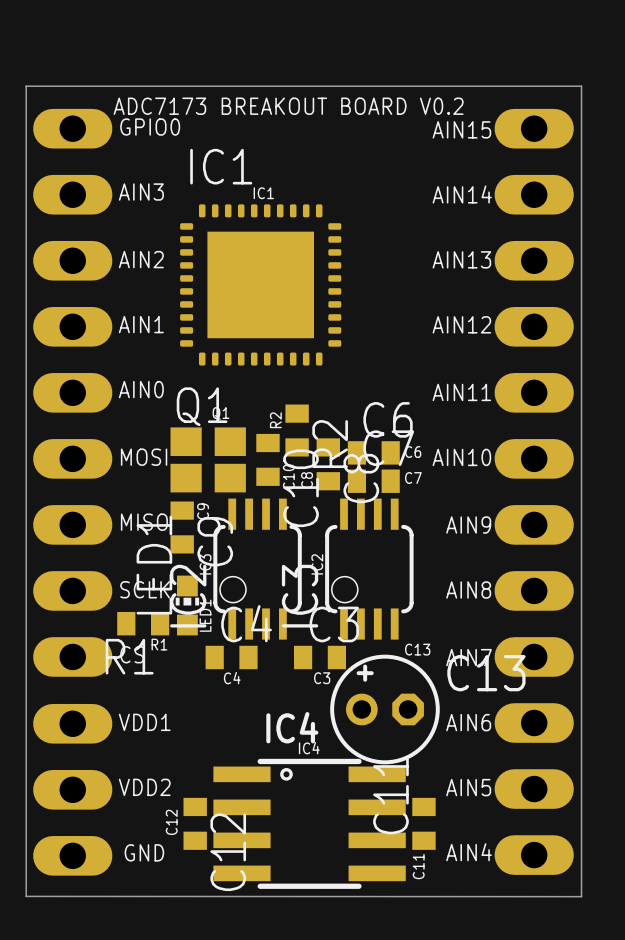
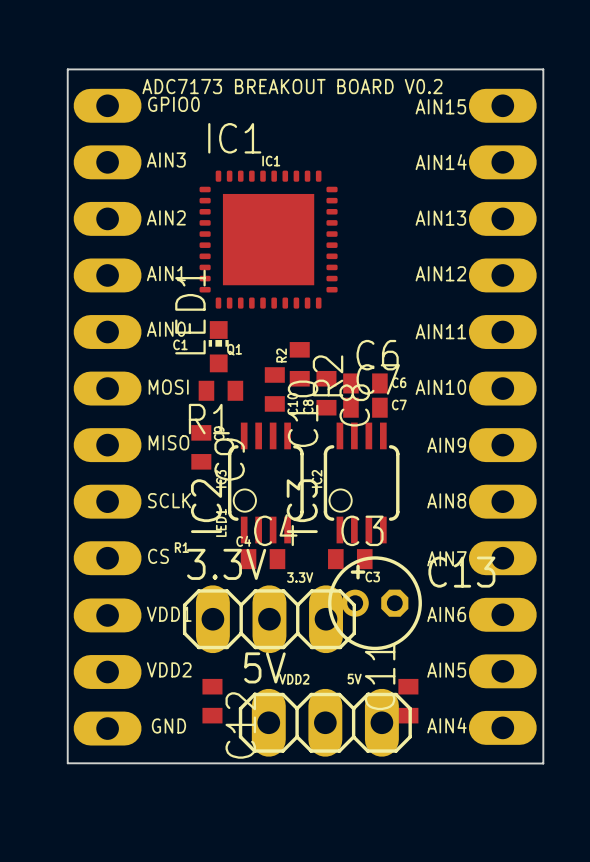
text: none -> C1 (180, 344)
Q1: (208, 459) -> none
LED1 position: (187, 605) -> (218, 346)
R1 position: (143, 623) -> (220, 390)
text: C13 (417, 649) -> none
C4 position: (231, 657) -> (263, 559)
C3 position: (319, 657) -> (350, 559)
text position: C4 (232, 678) -> C4 (243, 541)
text position: C3 (322, 678) -> C3 (372, 576)
text: none -> 3.3V (300, 577)
3.3V: none -> (269, 619)
text: IC4 (309, 748) -> none
text: none -> VDD2 (294, 679)
text: none -> 5V (354, 679)
text: C12 (171, 822) -> none
IC4: (309, 823) -> none
5V: none -> (325, 722)
text: C11 (418, 866) -> none

